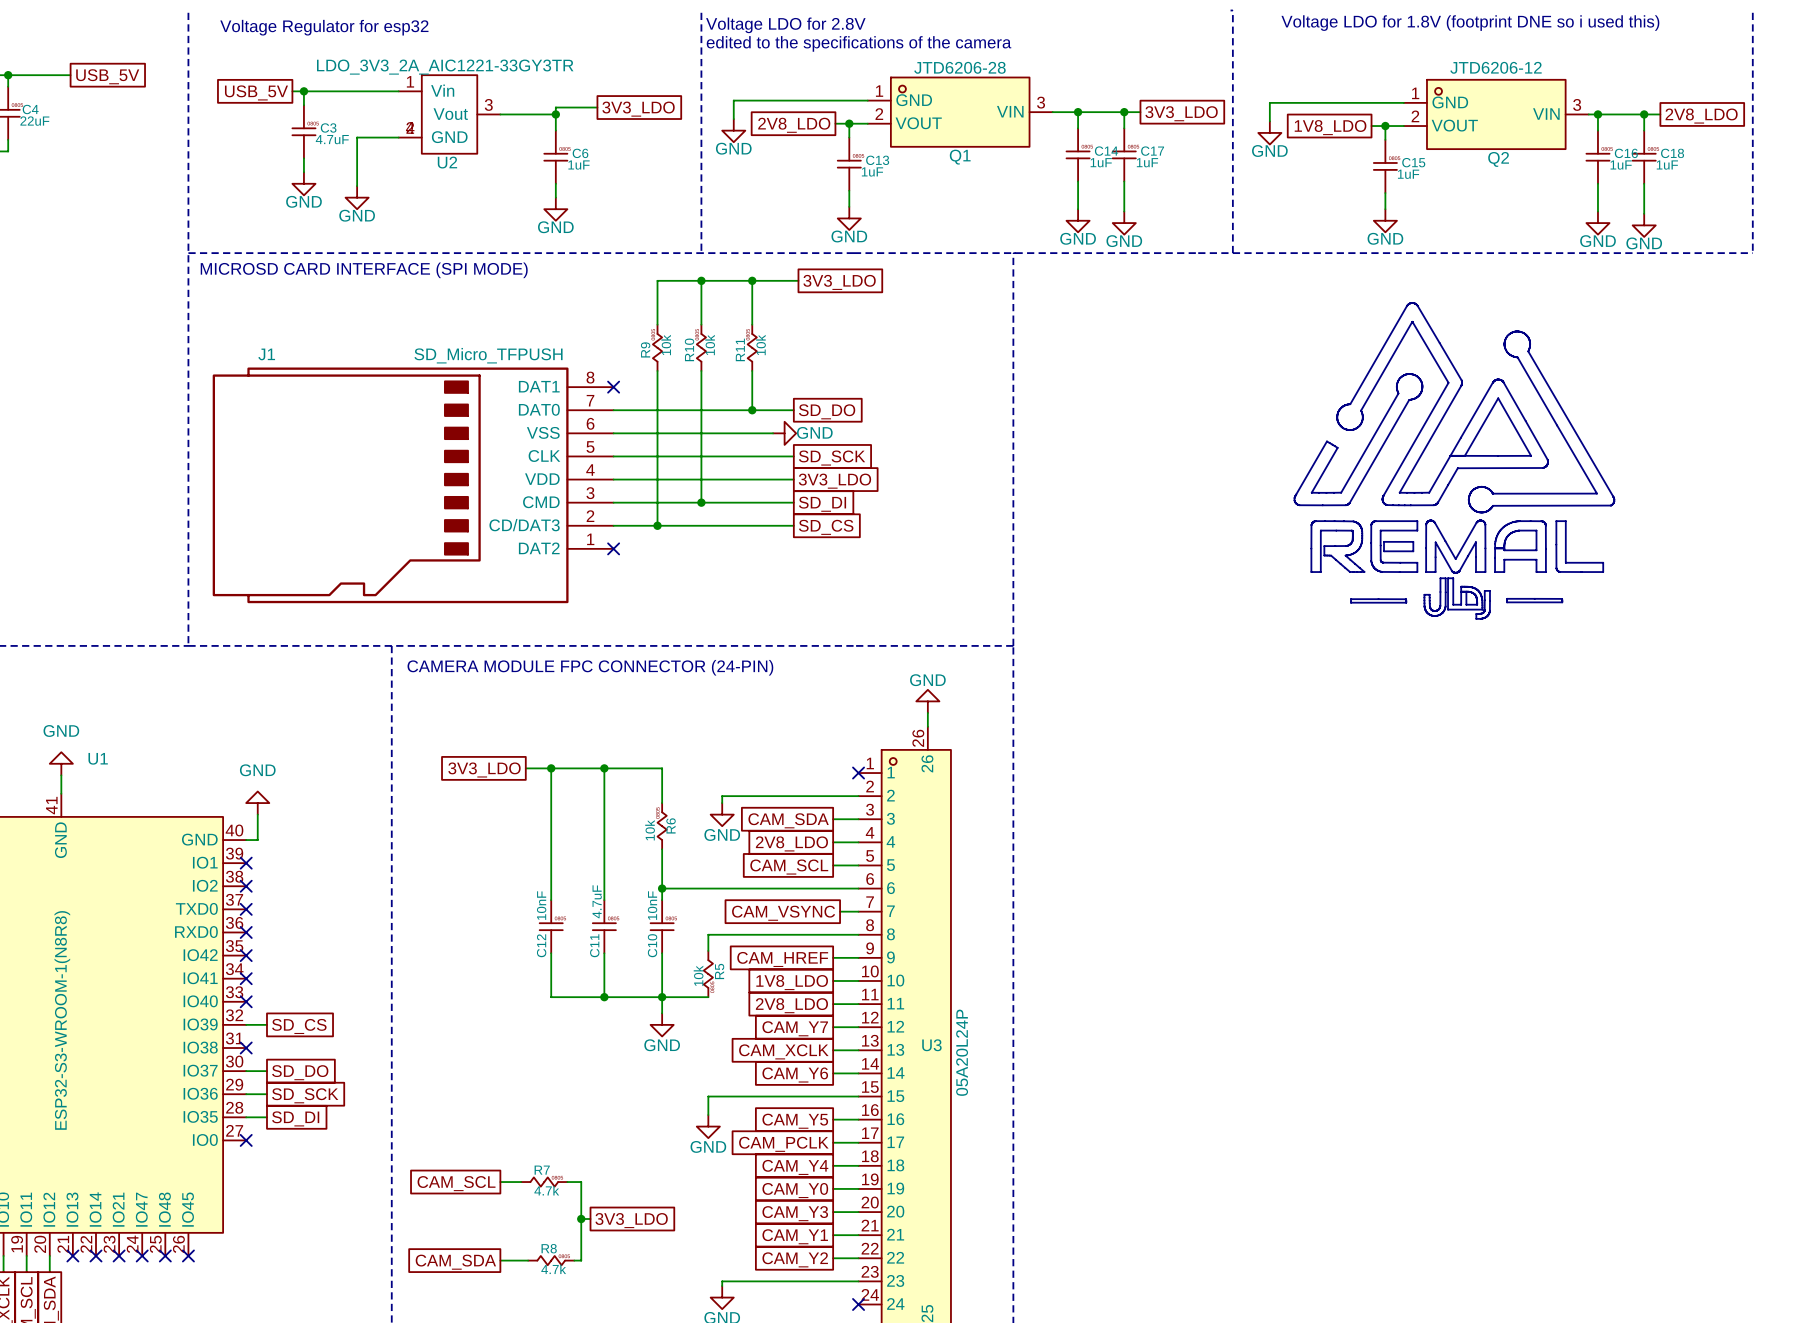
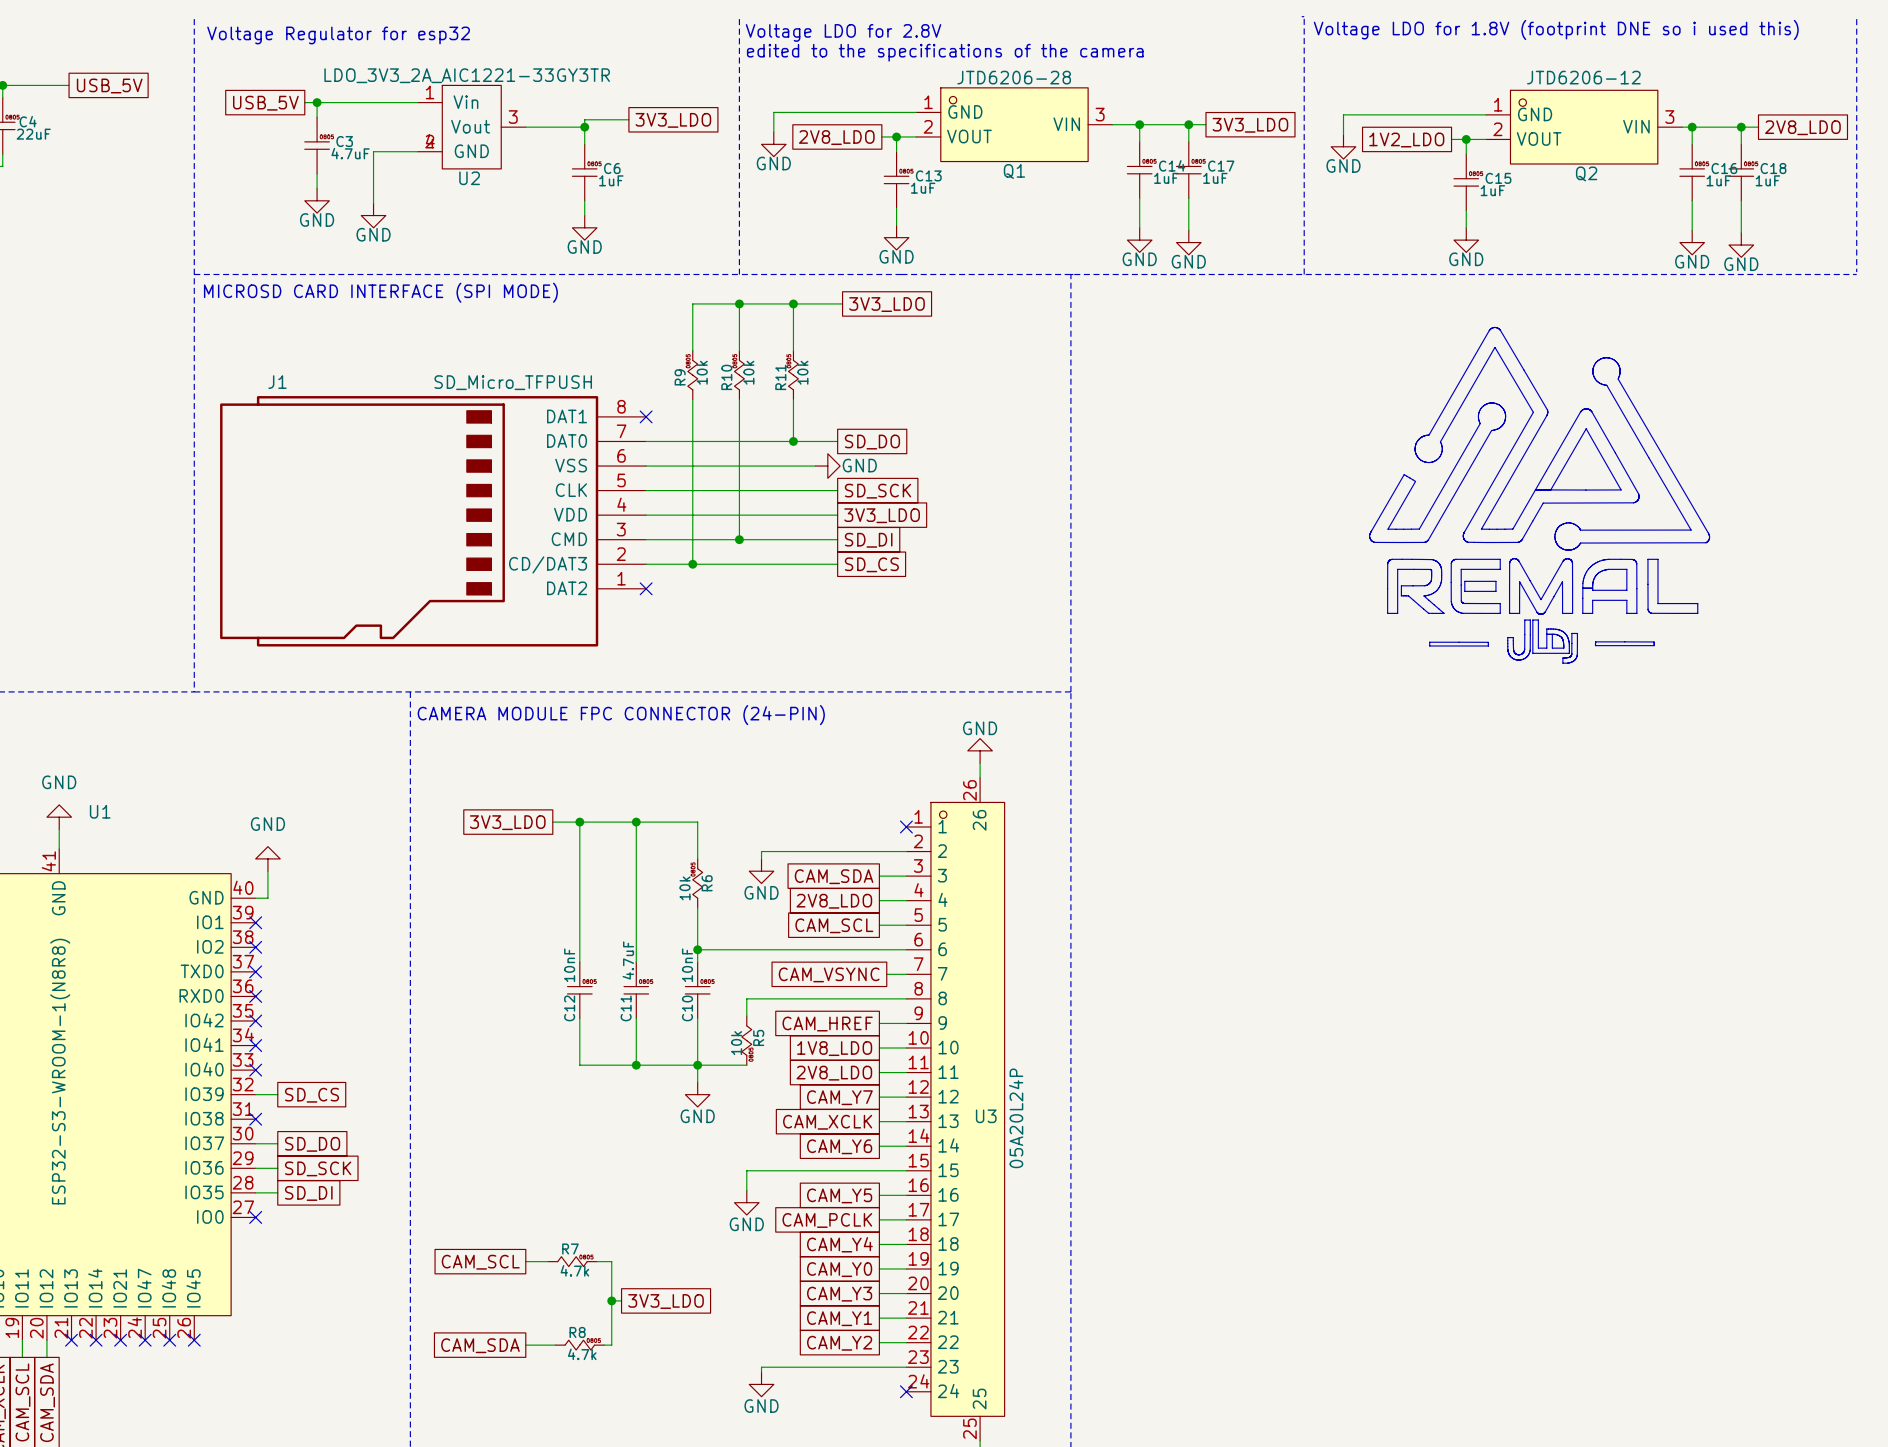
global label: 1V8_LDO (1330, 127) -> 1V2_LDO (1406, 140)

